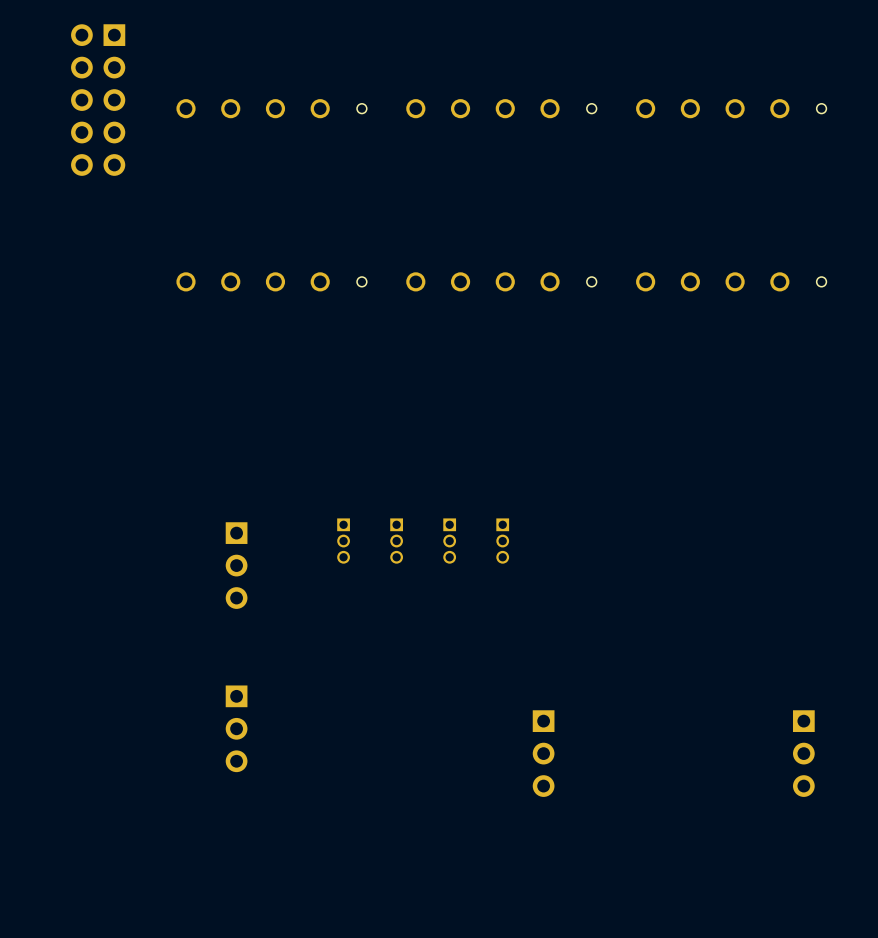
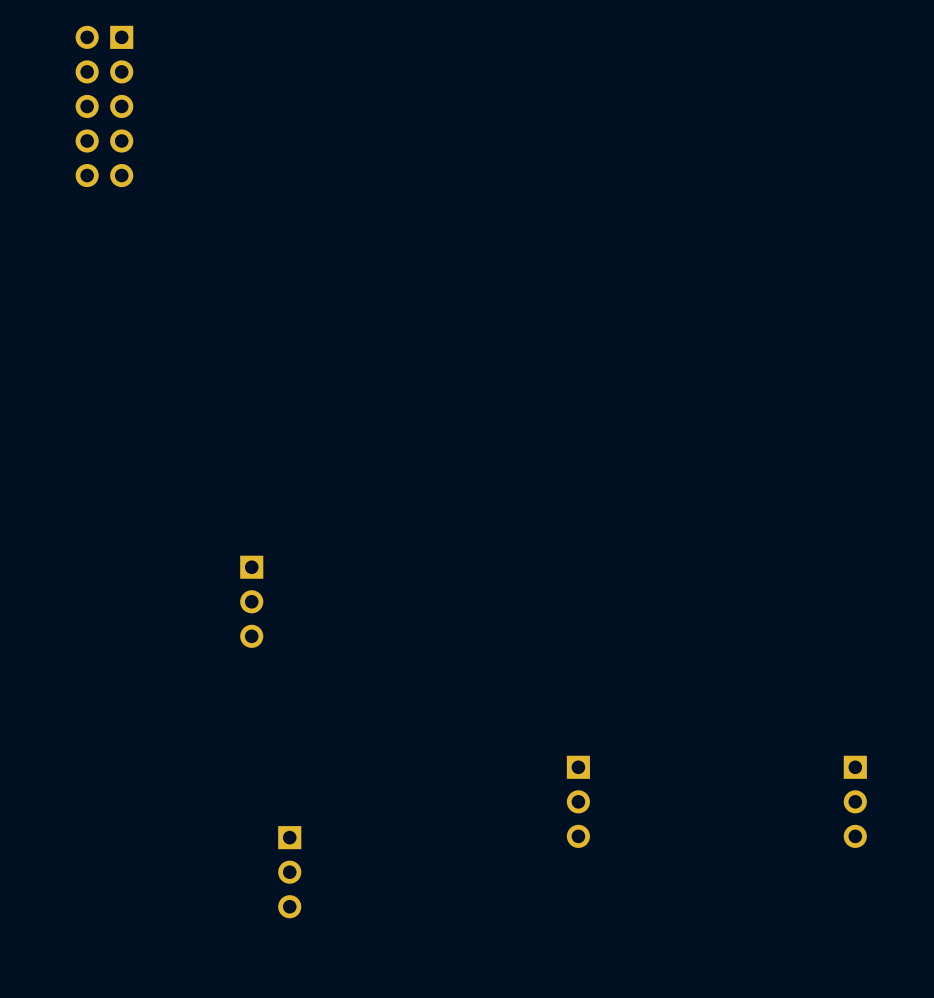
part: (271, 108) -> none
part: (501, 108) -> none
part: (731, 108) -> none
part: (271, 281) -> none
part: (501, 281) -> none
part: (731, 281) -> none
part: (343, 541) -> none
part: (396, 541) -> none
part: (449, 541) -> none
part: (502, 541) -> none
part position: (236, 728) -> (289, 872)

